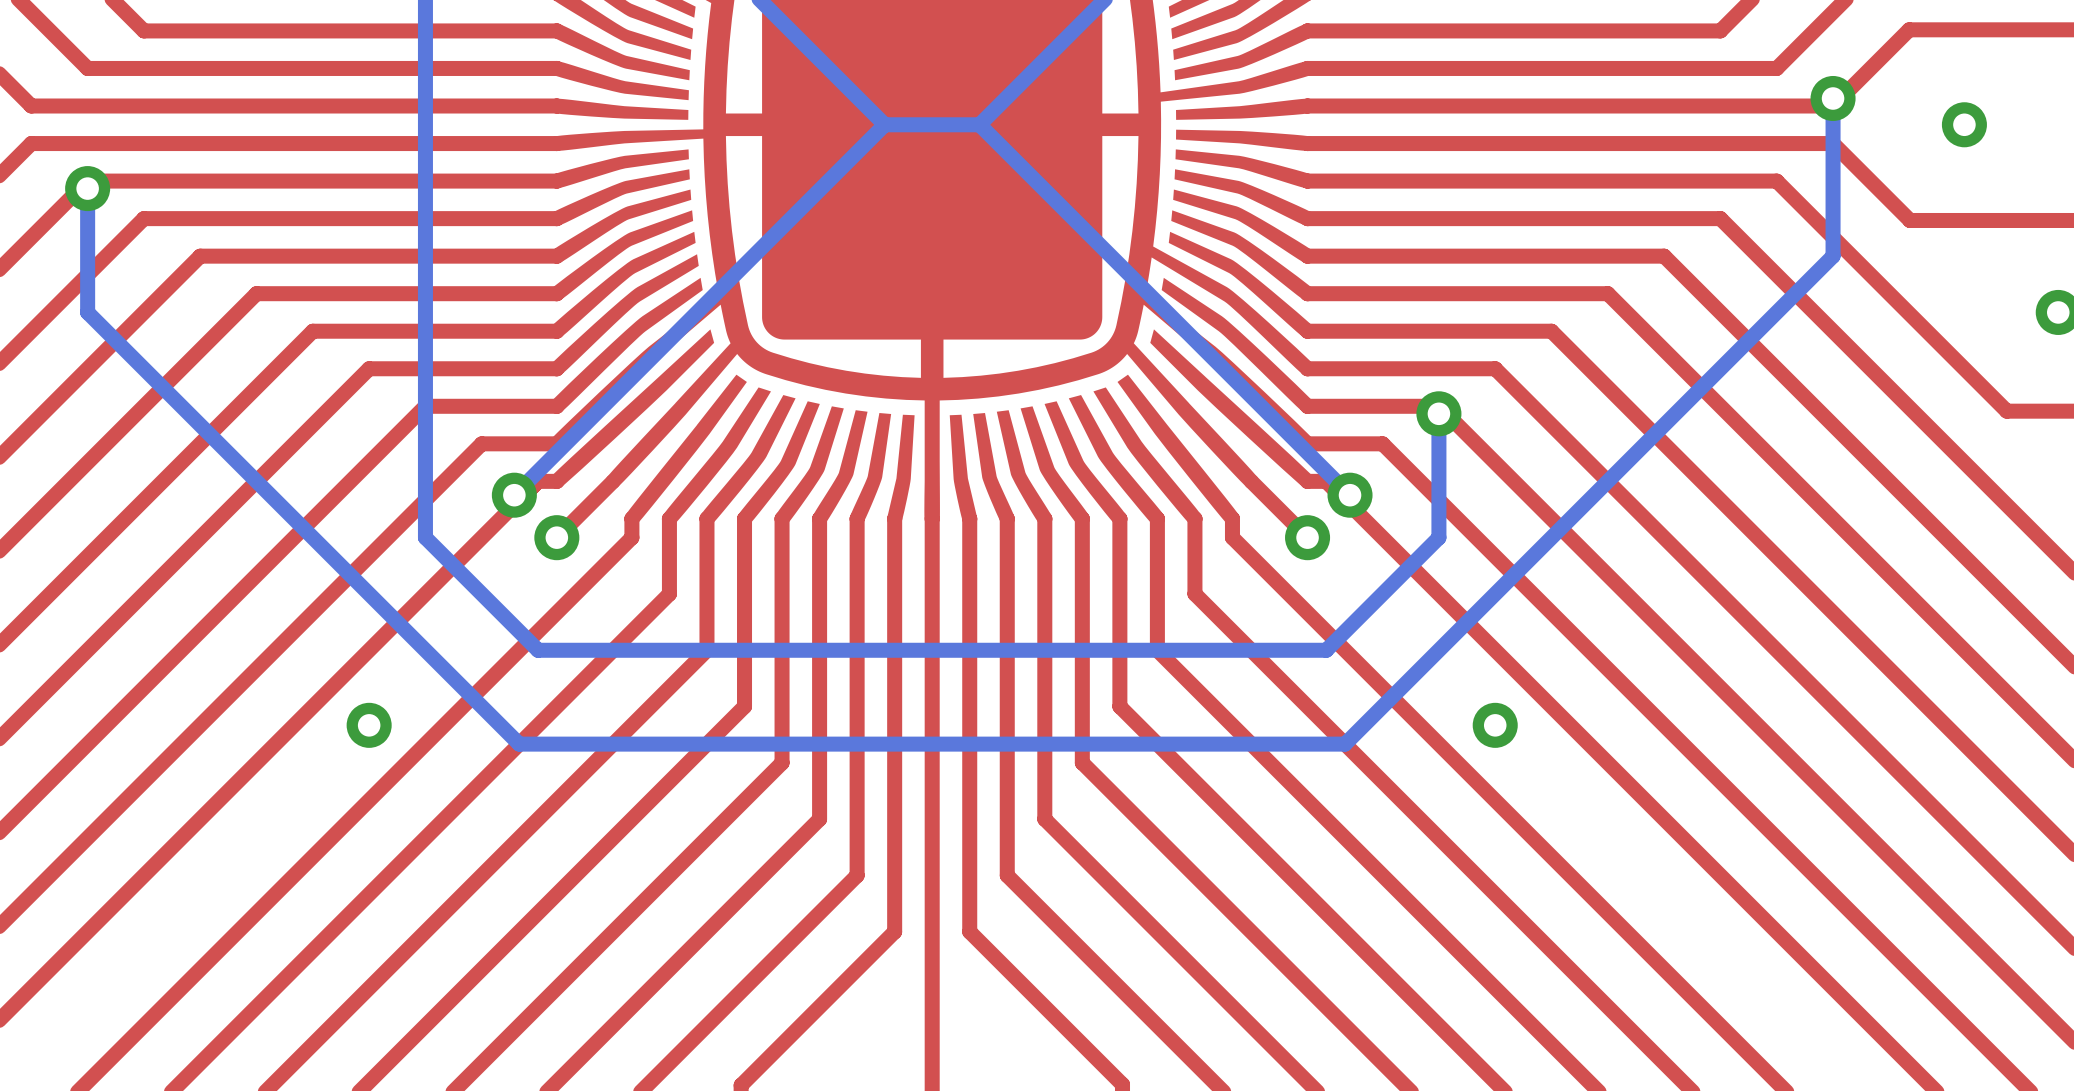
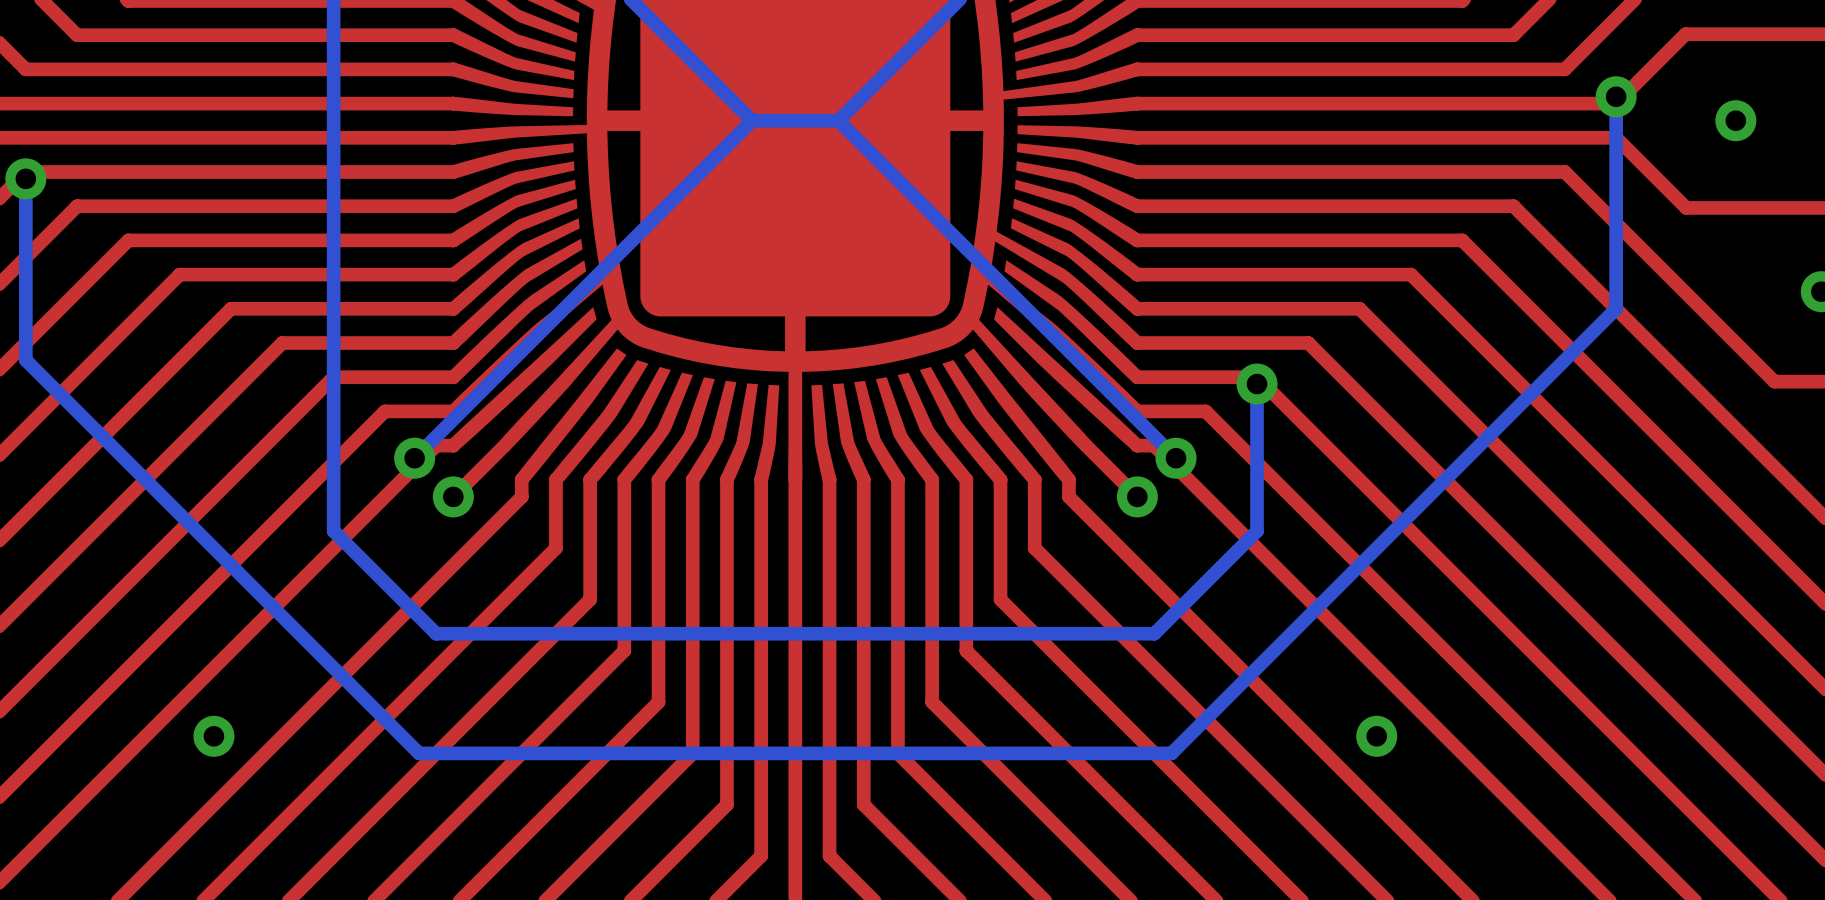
bottom track: (1833, 256) (1345, 744) (519, 744) (87, 312) -> (1616, 240) (1616, 308) (1171, 753) (419, 753) (25, 360) (25, 291)
bottom track: (1438, 537) (1326, 650) (538, 650) (425, 537) -> (1257, 496) (1257, 531) (1154, 633) (436, 633) (333, 531) (333, 496)
via position: (369, 725) -> (213, 736)
via position: (1495, 725) -> (1376, 736)

